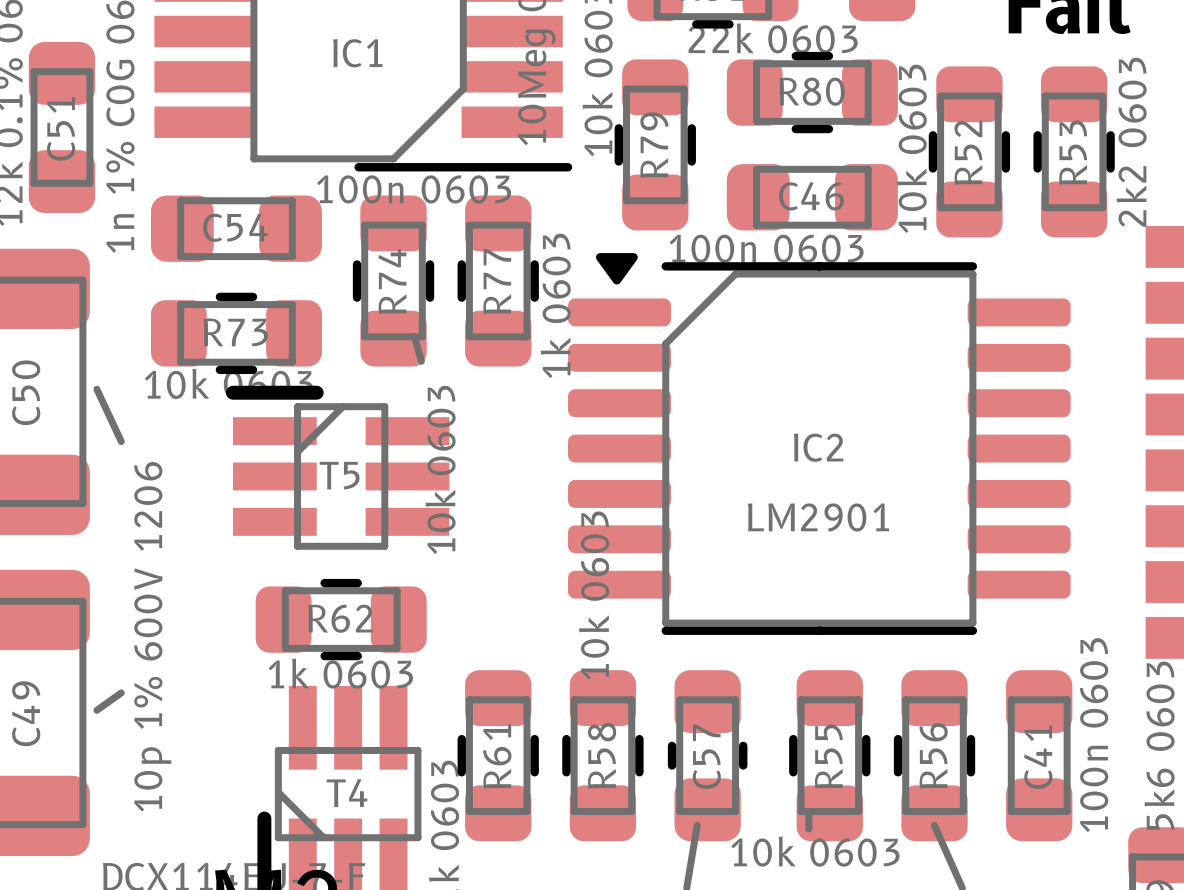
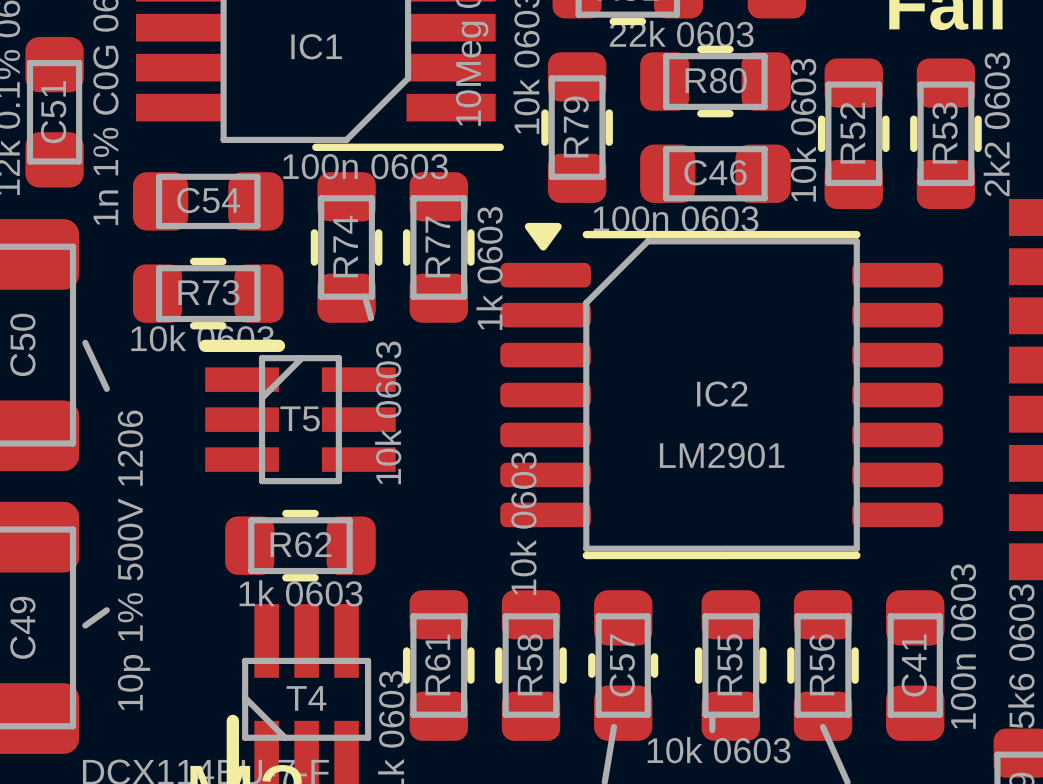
C49 value: 10p 1% 600V 1206 (152, 636) -> 10p 1% 500V 1206 (134, 560)

